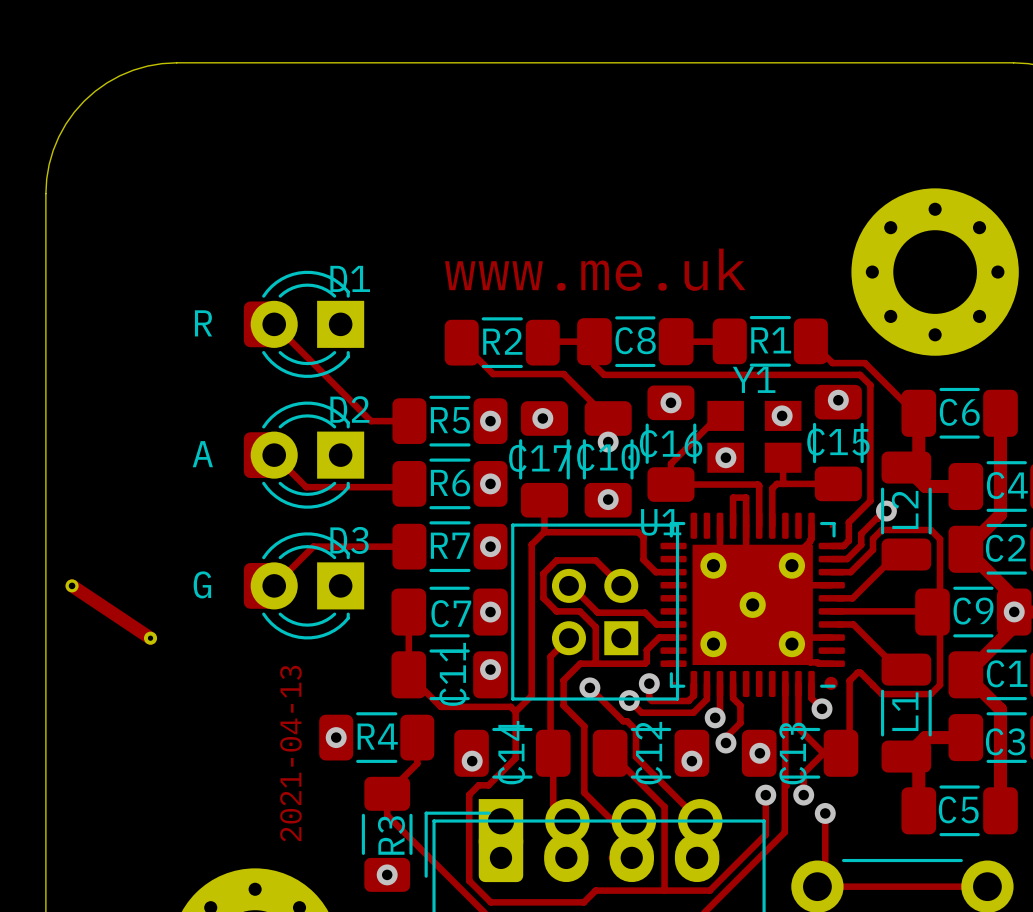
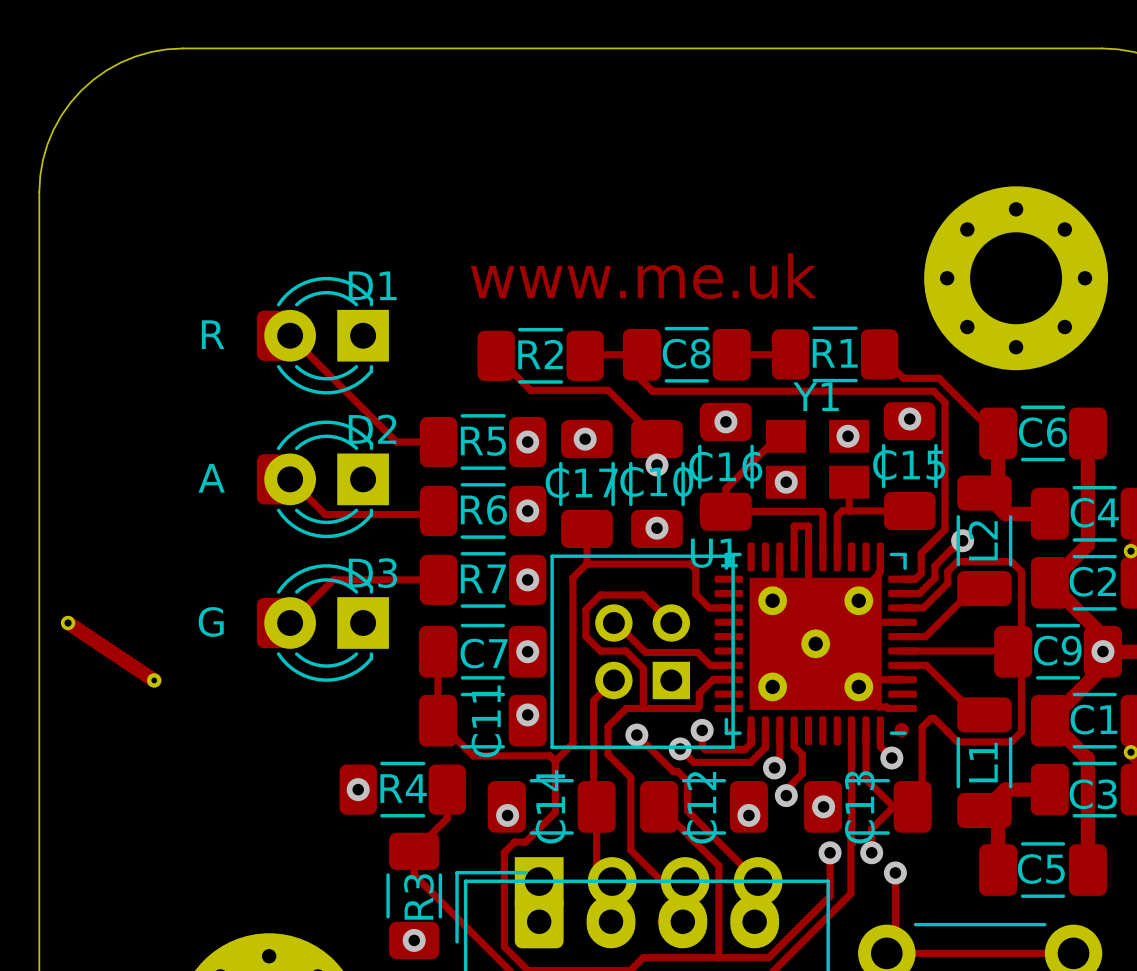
text: 2021-04-13 (290, 753) -> none

